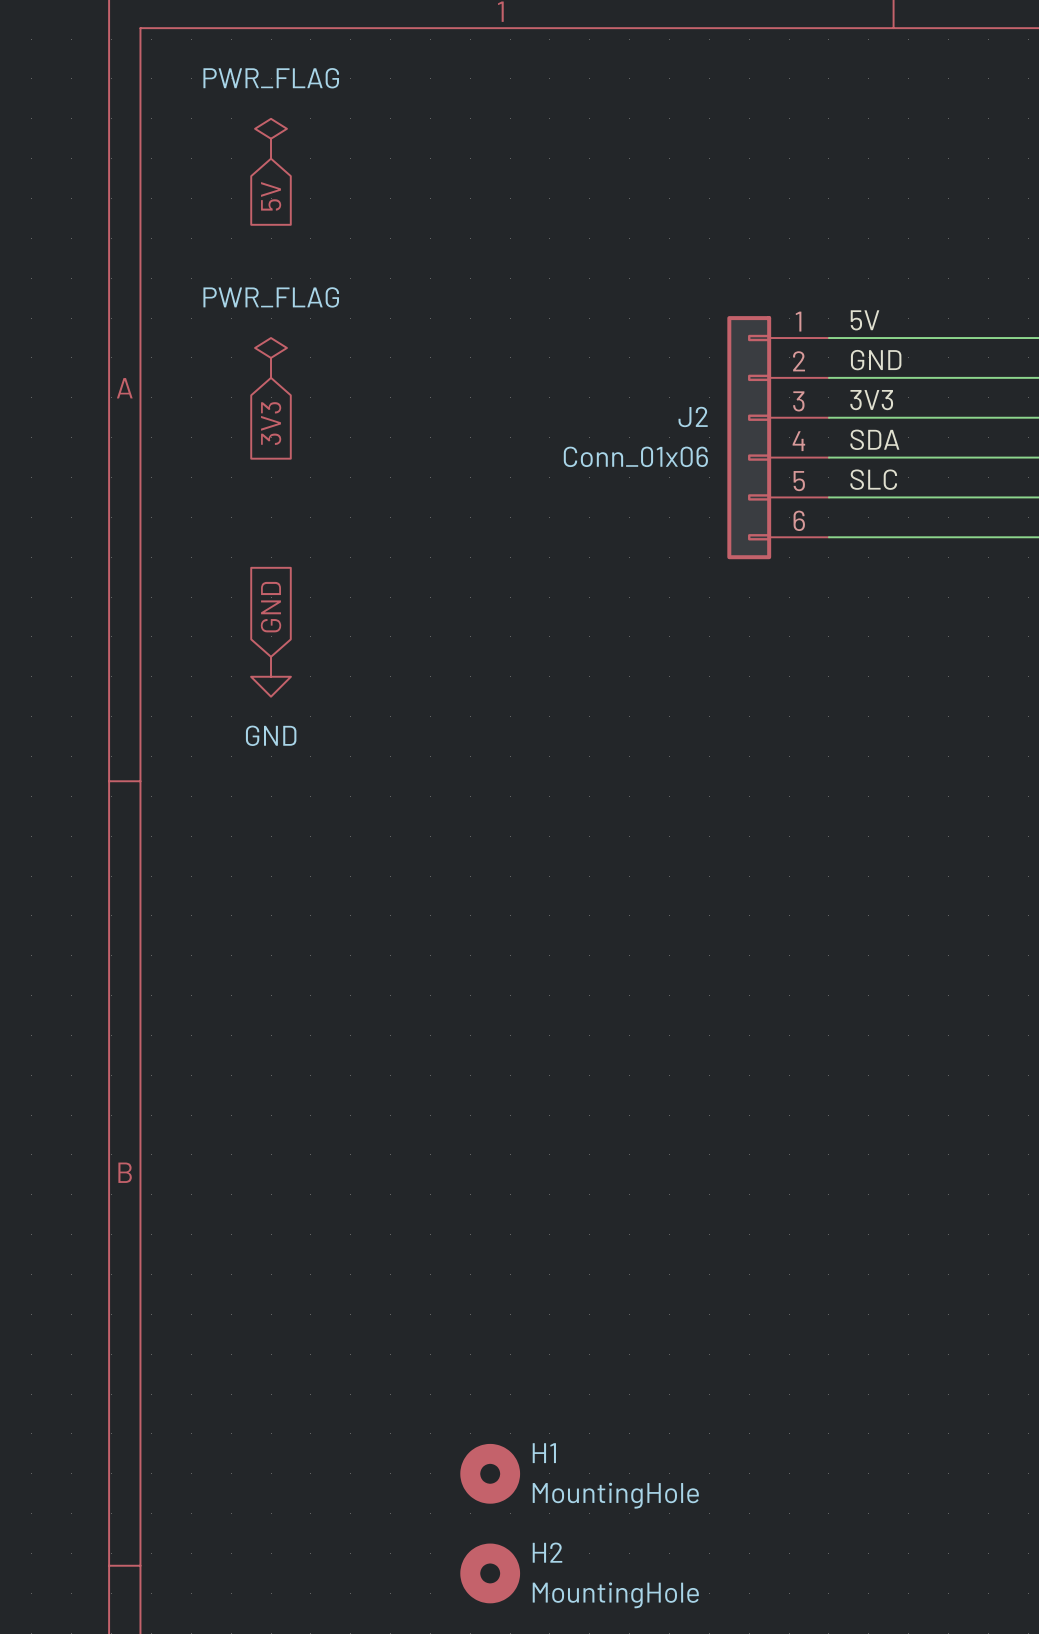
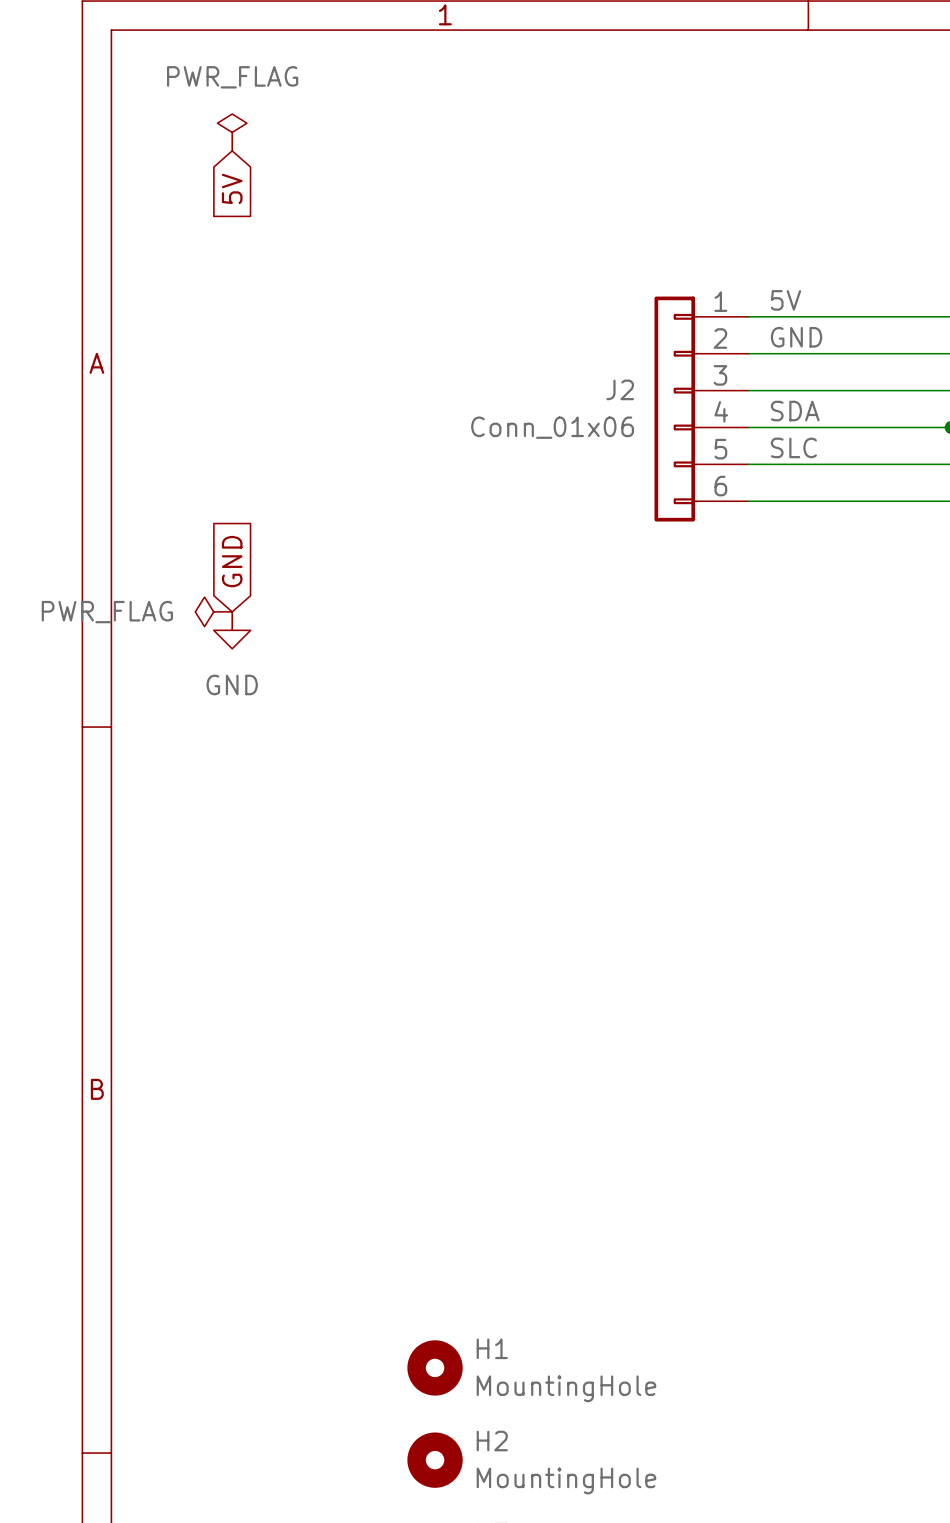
power symbol text position: PWR_FLAG (271, 297) -> PWR_FLAG (107, 612)
power symbol rotation: 0° (271, 357) -> 90° counterclockwise (213, 611)
power symbol position: PWR_FLAG (271, 357) -> PWR_FLAG (213, 611)
label: 3V3 (871, 400) -> none
global label: 3V3 (271, 423) -> none

